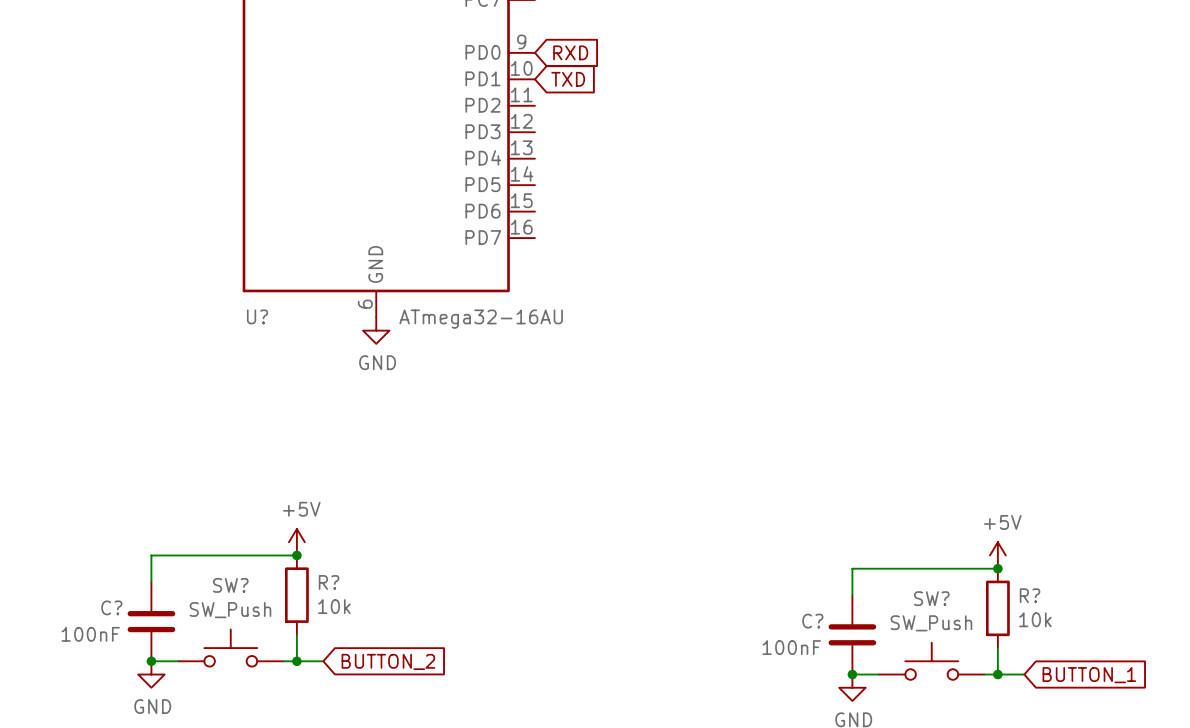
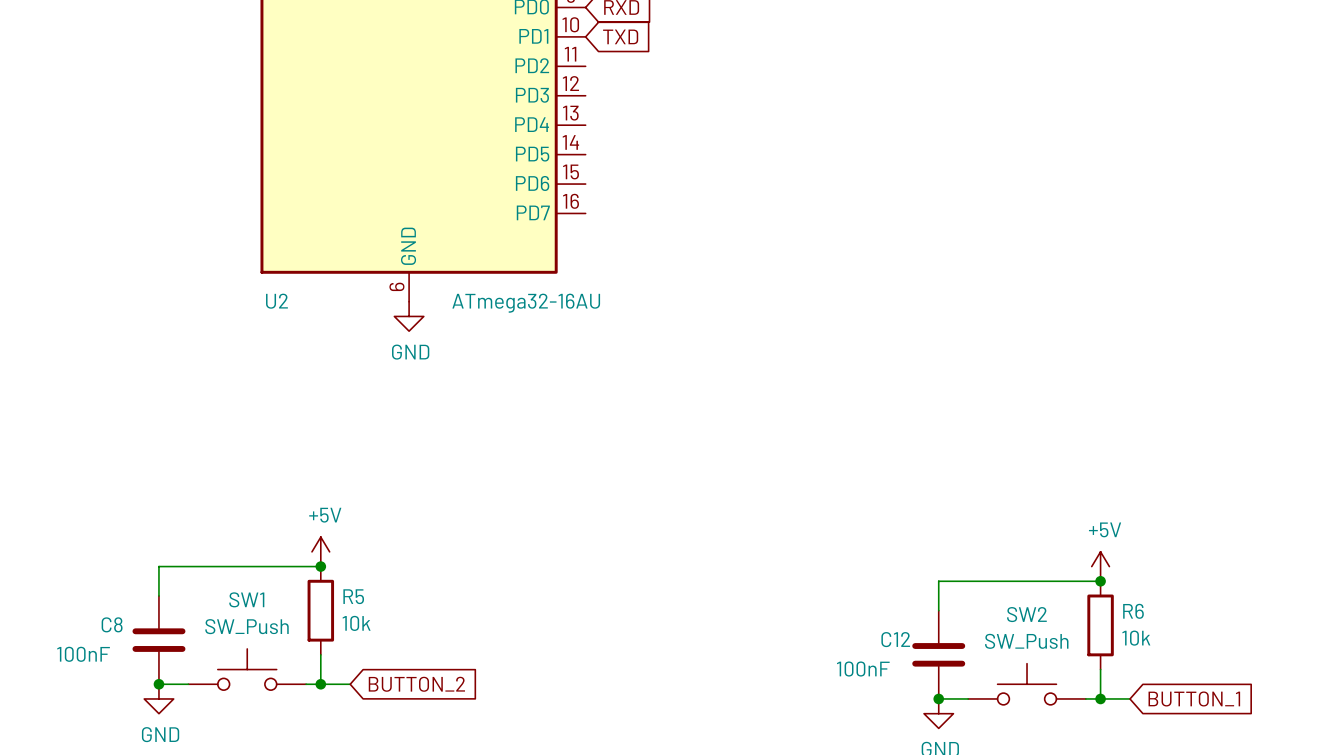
U? name: U? (257, 316) -> U2 (276, 301)
R? name: R? (329, 582) -> R5 (353, 596)
SW? name: SW? (230, 585) -> SW1 (246, 599)
R? name: R? (1030, 595) -> R6 (1133, 611)
SW? name: SW? (931, 598) -> SW2 (1026, 614)
C? name: C? (111, 607) -> C8 (112, 624)
C? name: C? (812, 621) -> C12 (895, 639)

